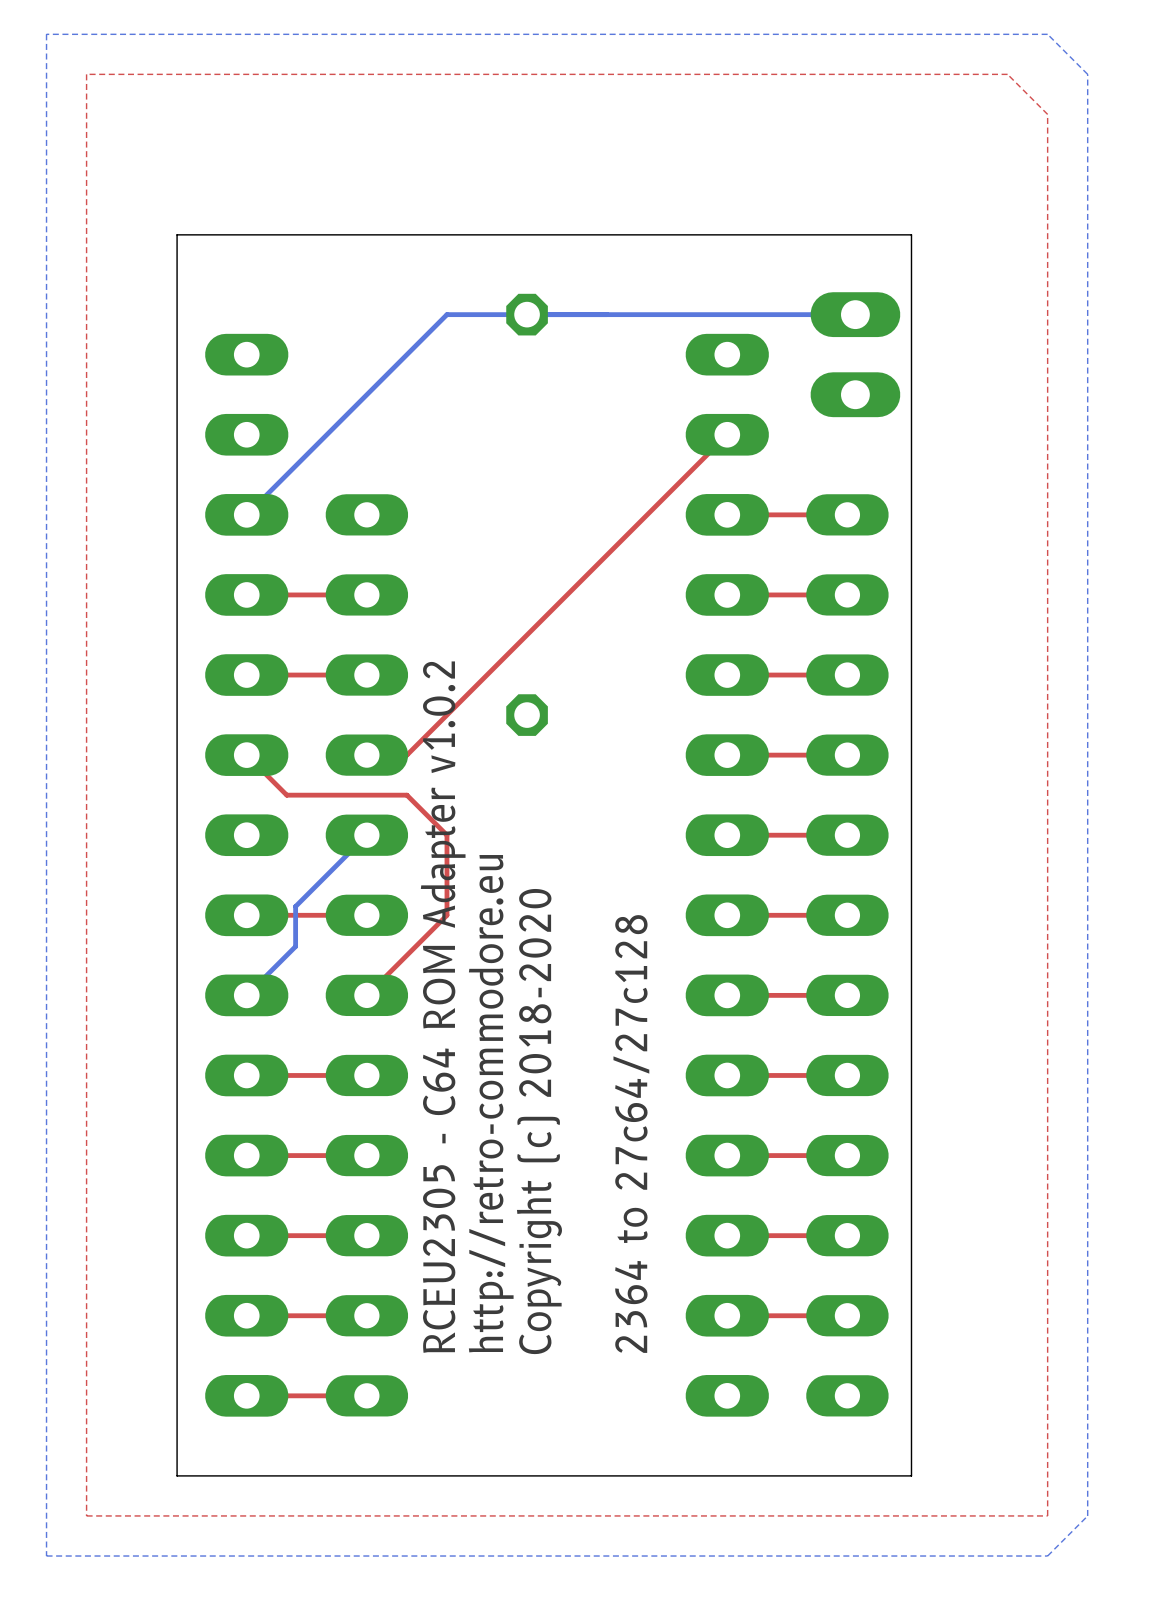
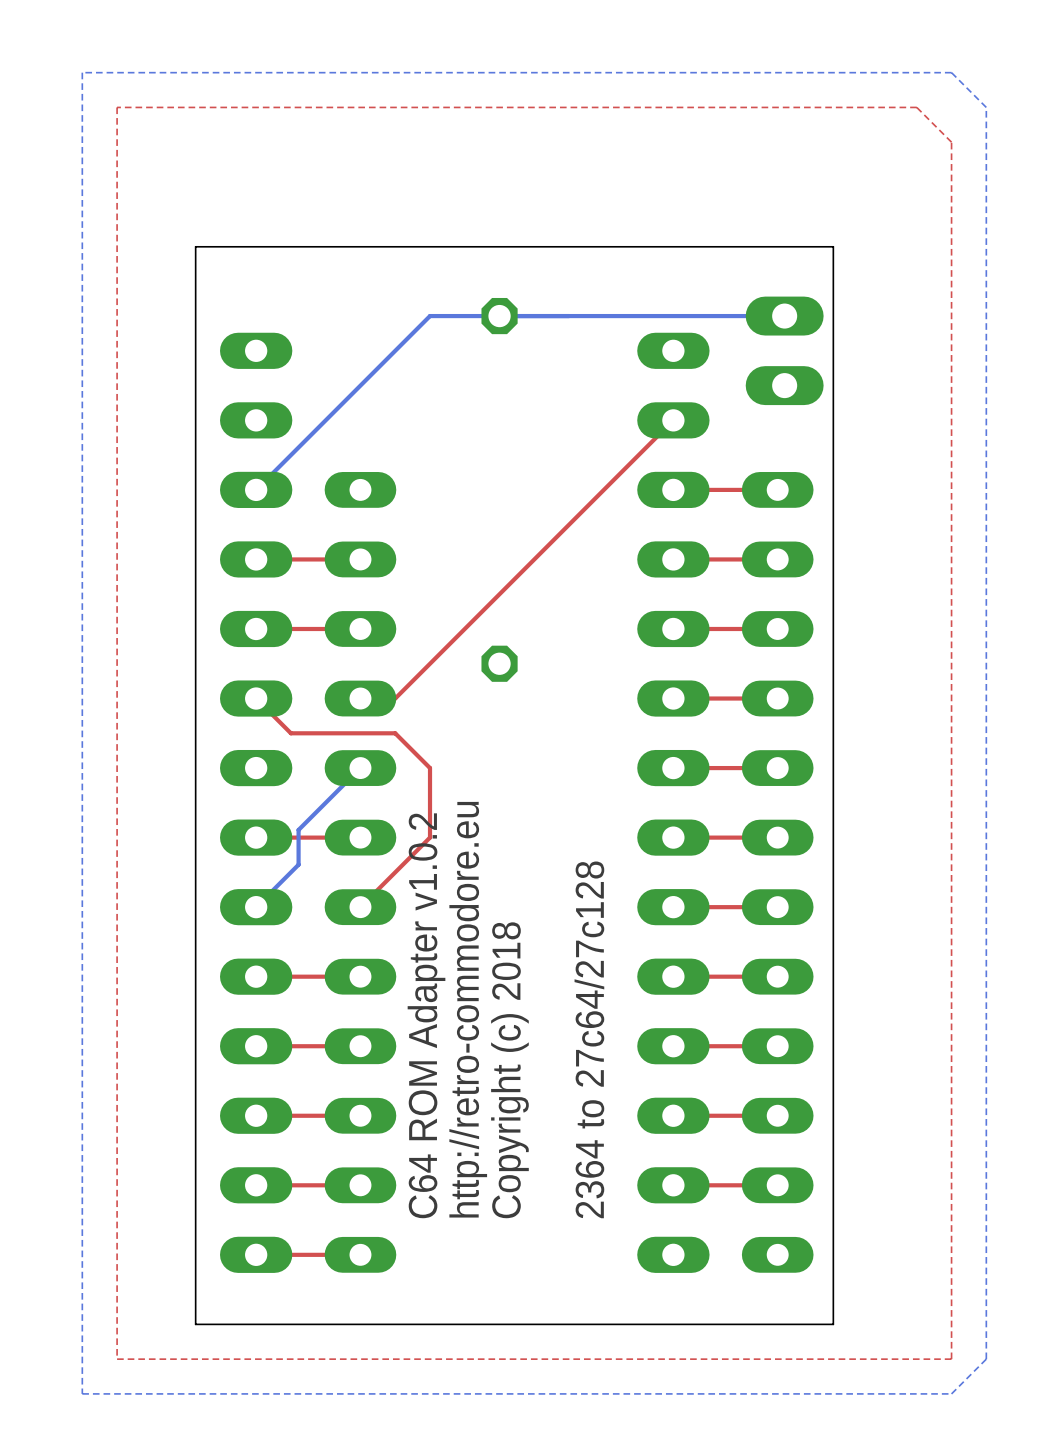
text: RCEU2305 - C64 ROM Adapter v1.0.2 (443, 1007) -> C64 ROM Adapter v1.0.2 (426, 1015)
text: Copyright (c) 2018-2020 (539, 1121) -> Copyright (c) 2018 (509, 1070)

